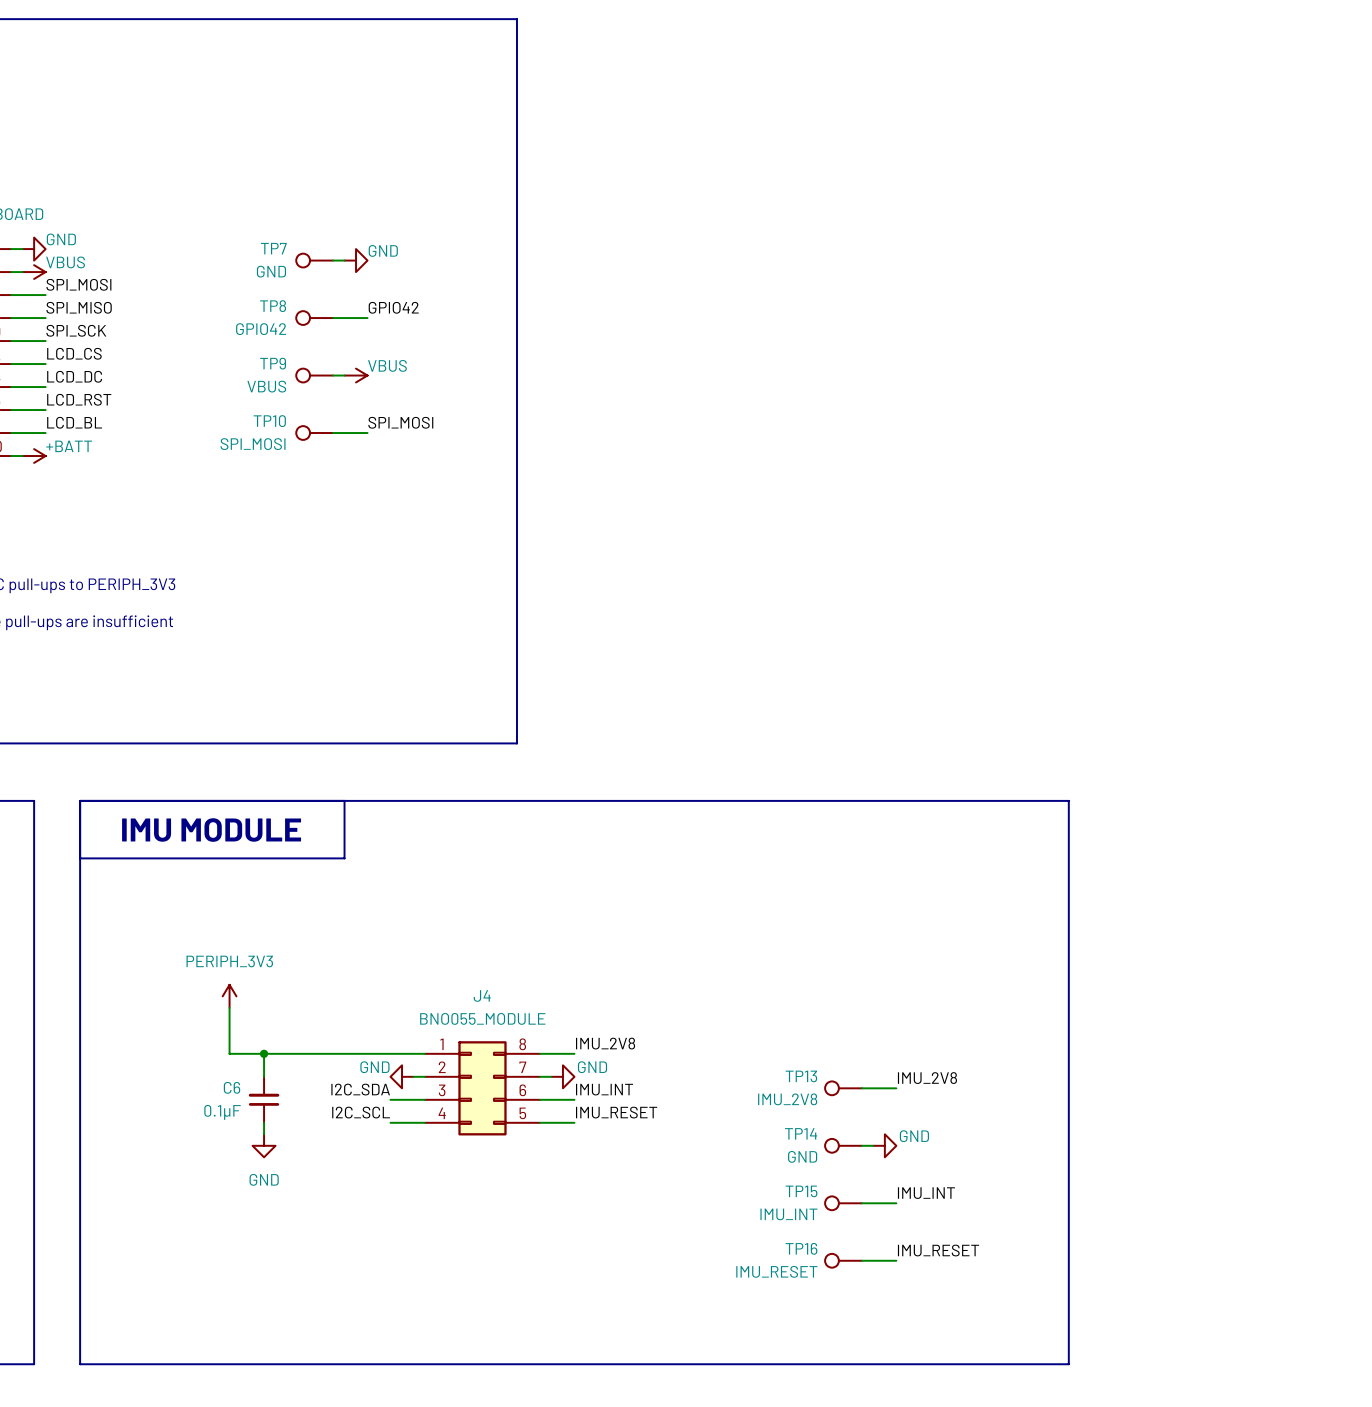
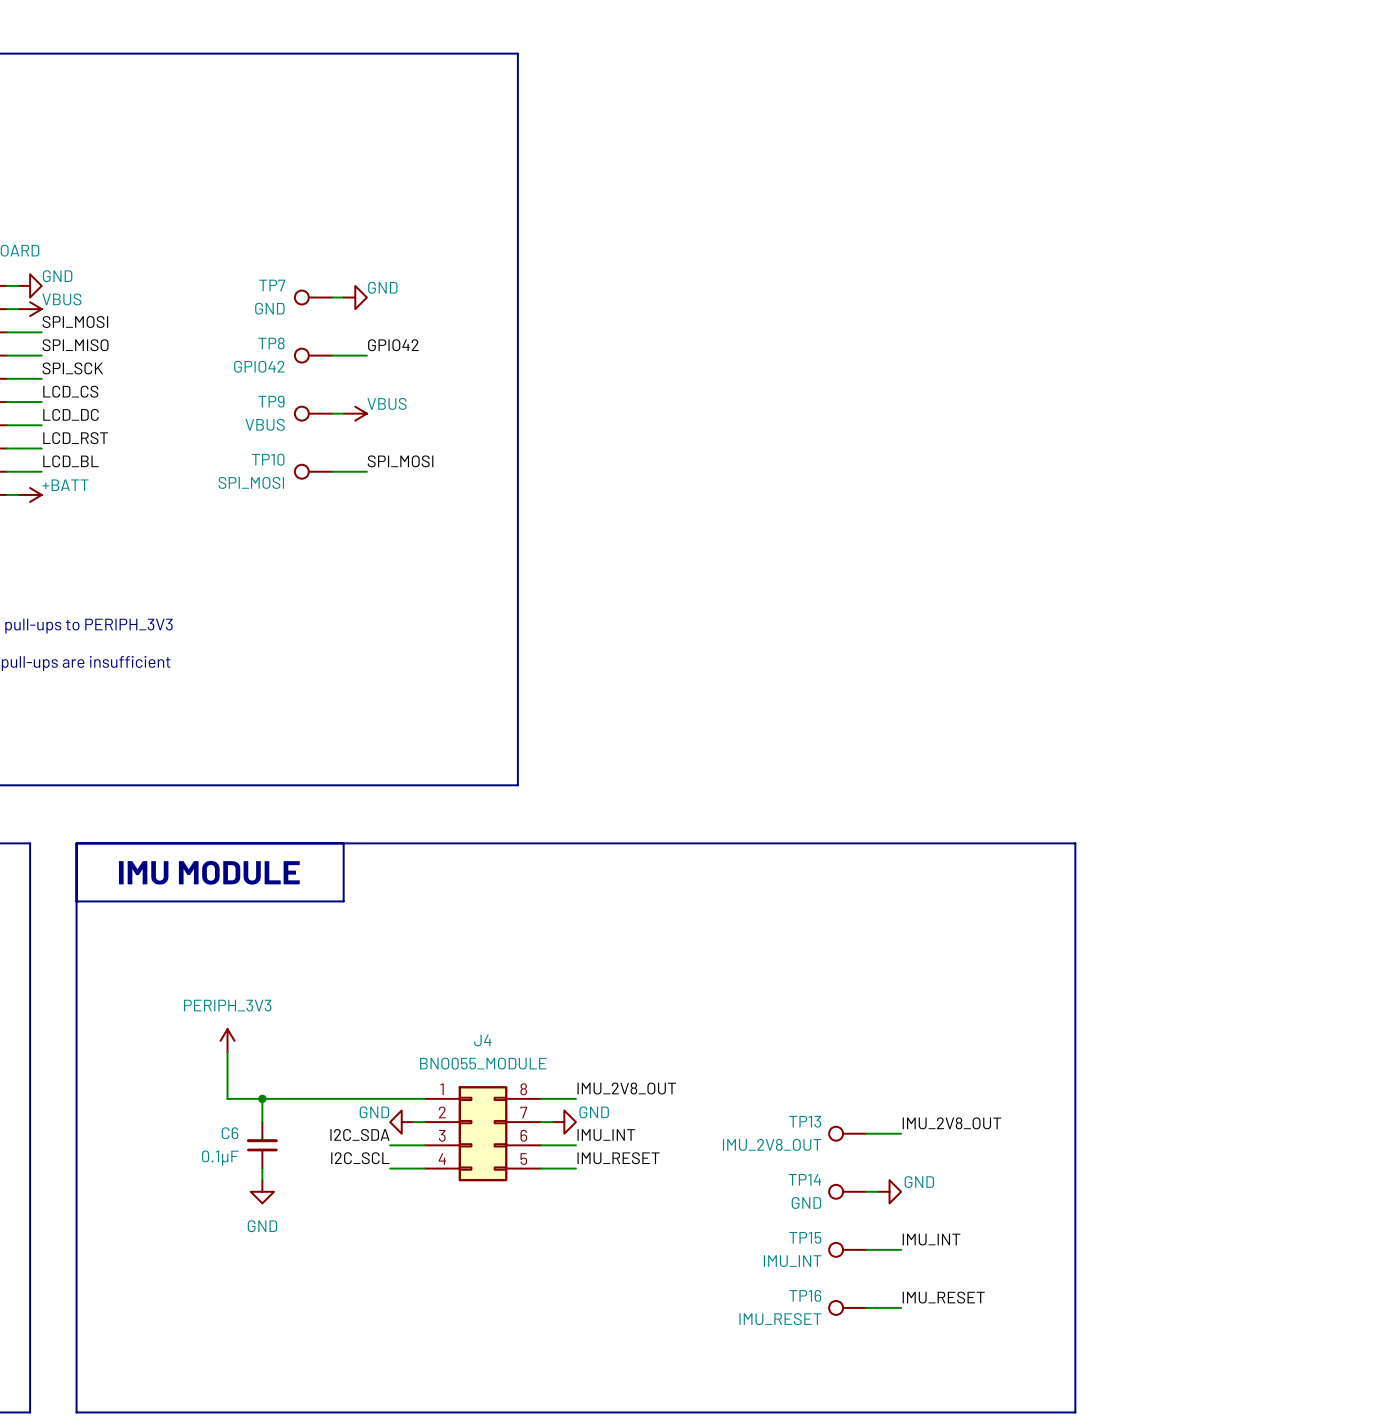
label: IMU_2V8 (605, 1043) -> IMU_2V8_OUT (626, 1088)
label: IMU_2V8 (927, 1078) -> IMU_2V8_OUT (951, 1123)
TP13 value: IMU_2V8 (787, 1099) -> IMU_2V8_OUT (772, 1144)

